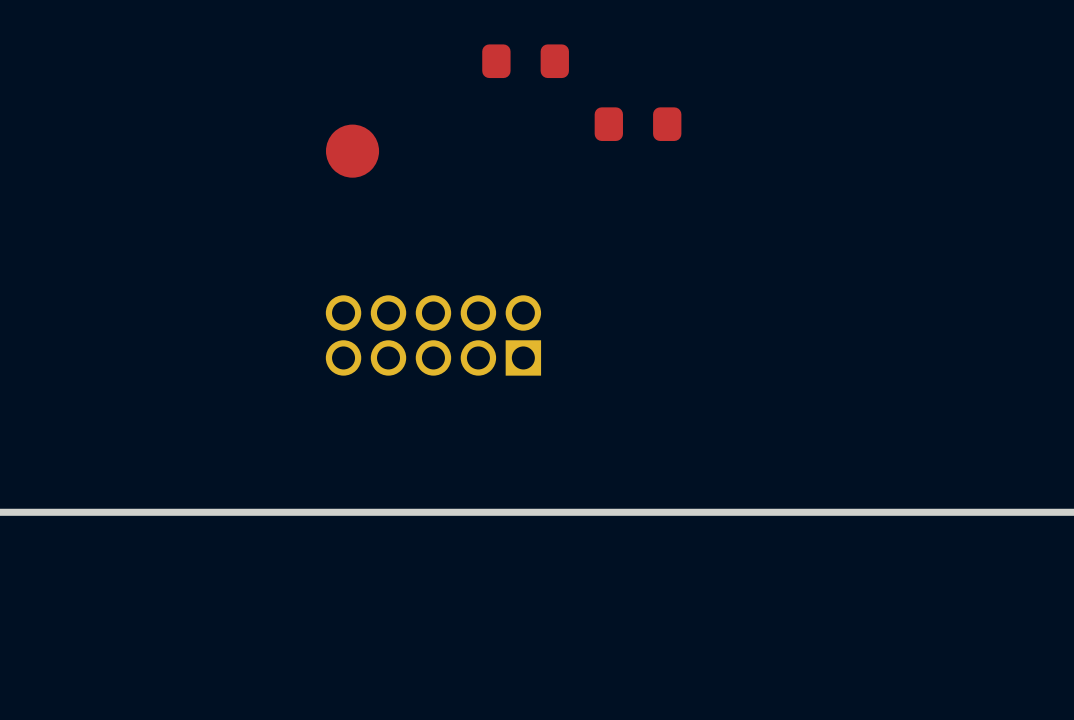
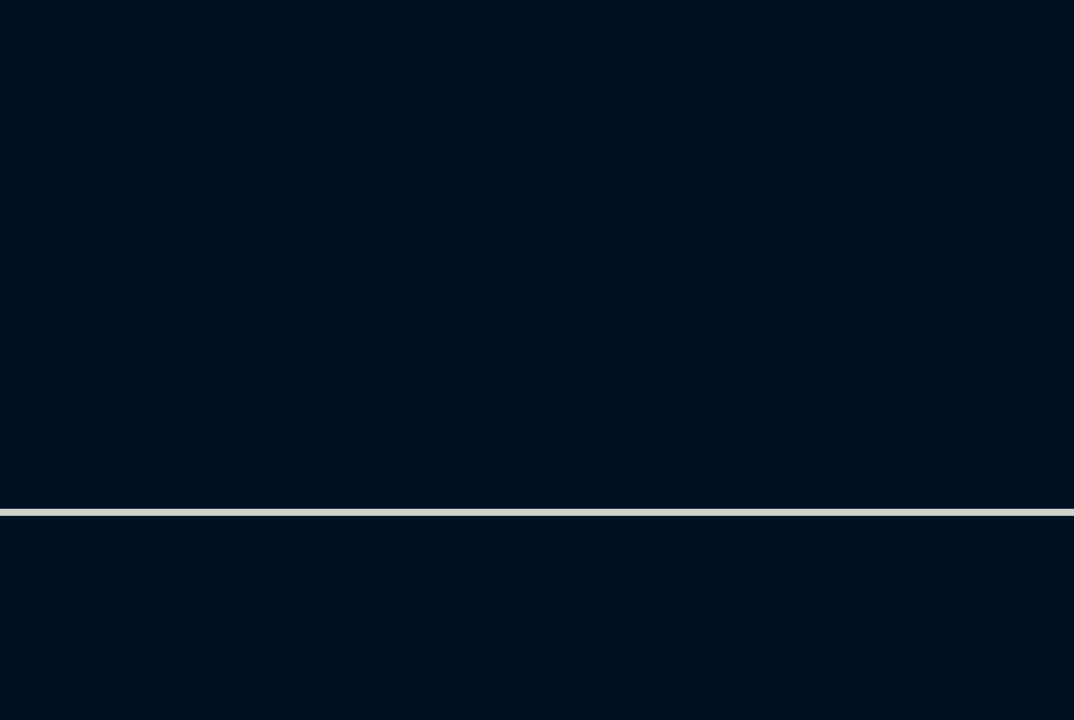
part: (525, 61) -> none
part: (638, 124) -> none
part: (352, 151) -> none
part: (433, 335) -> none

